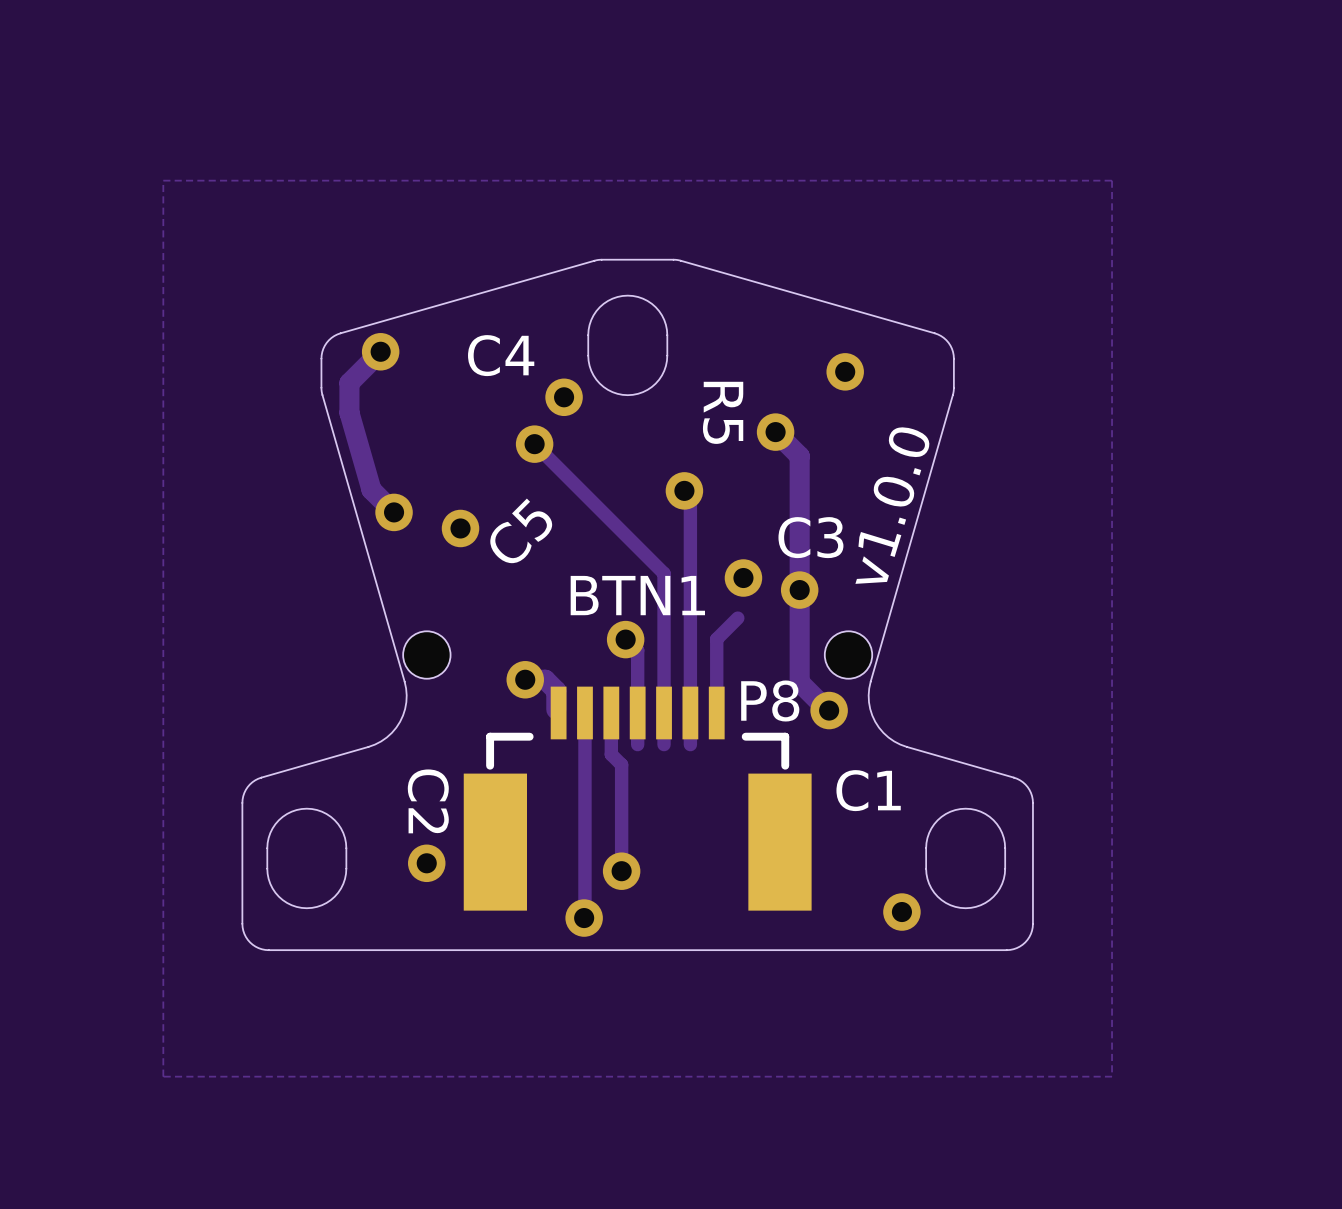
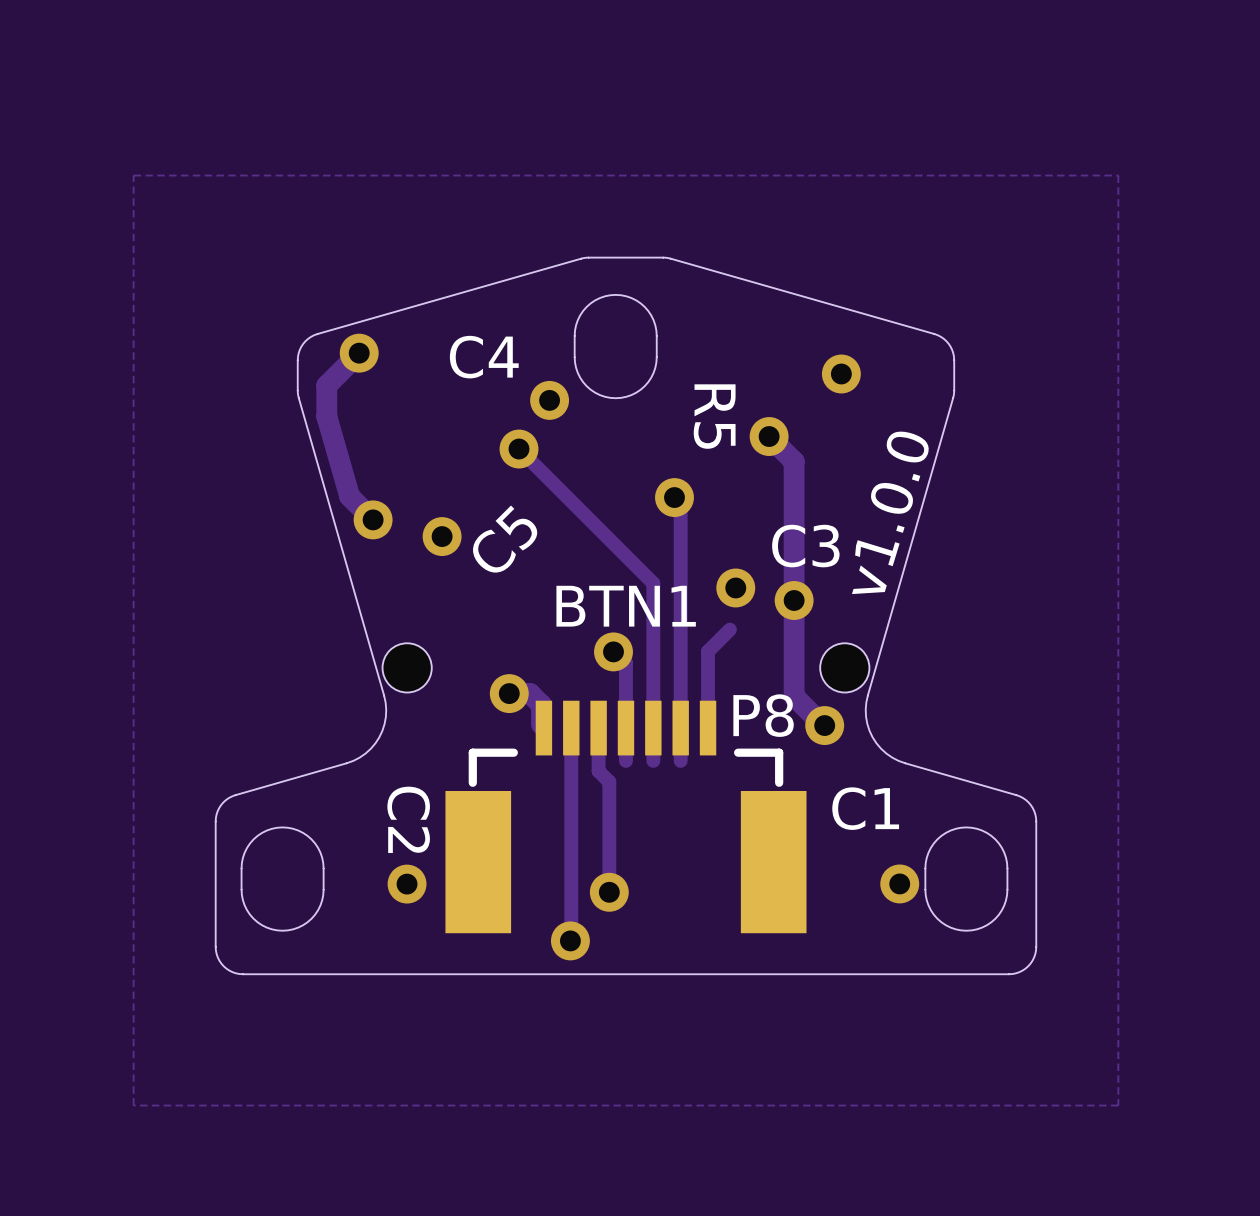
via position: (901, 912) -> (899, 883)

